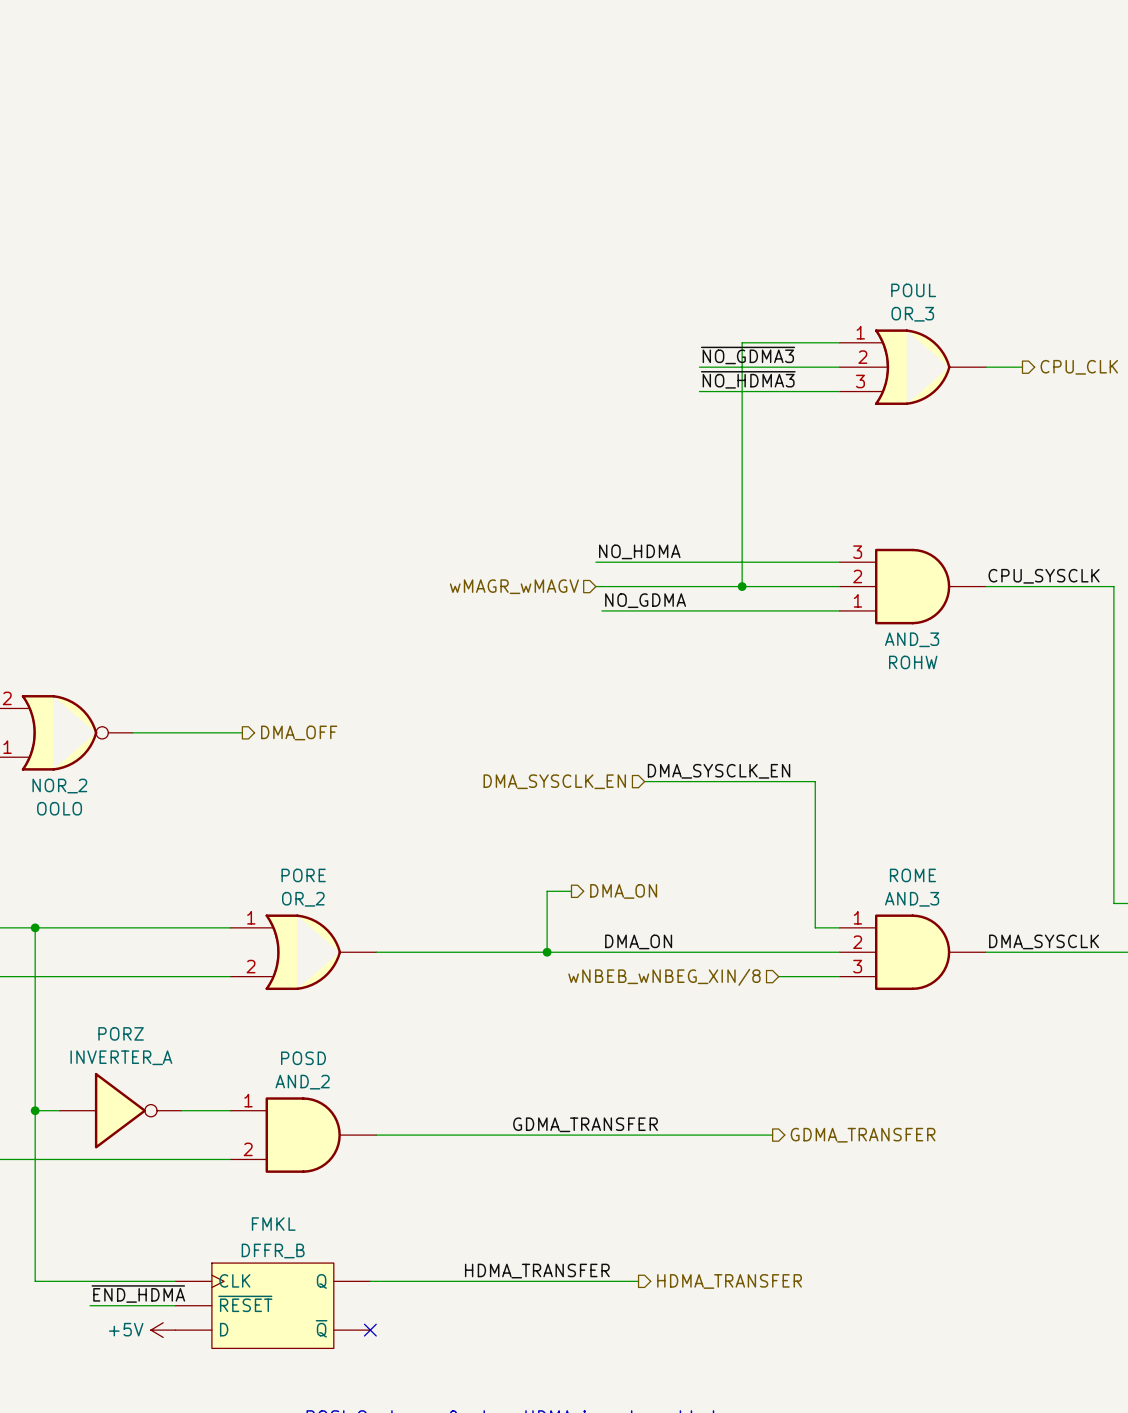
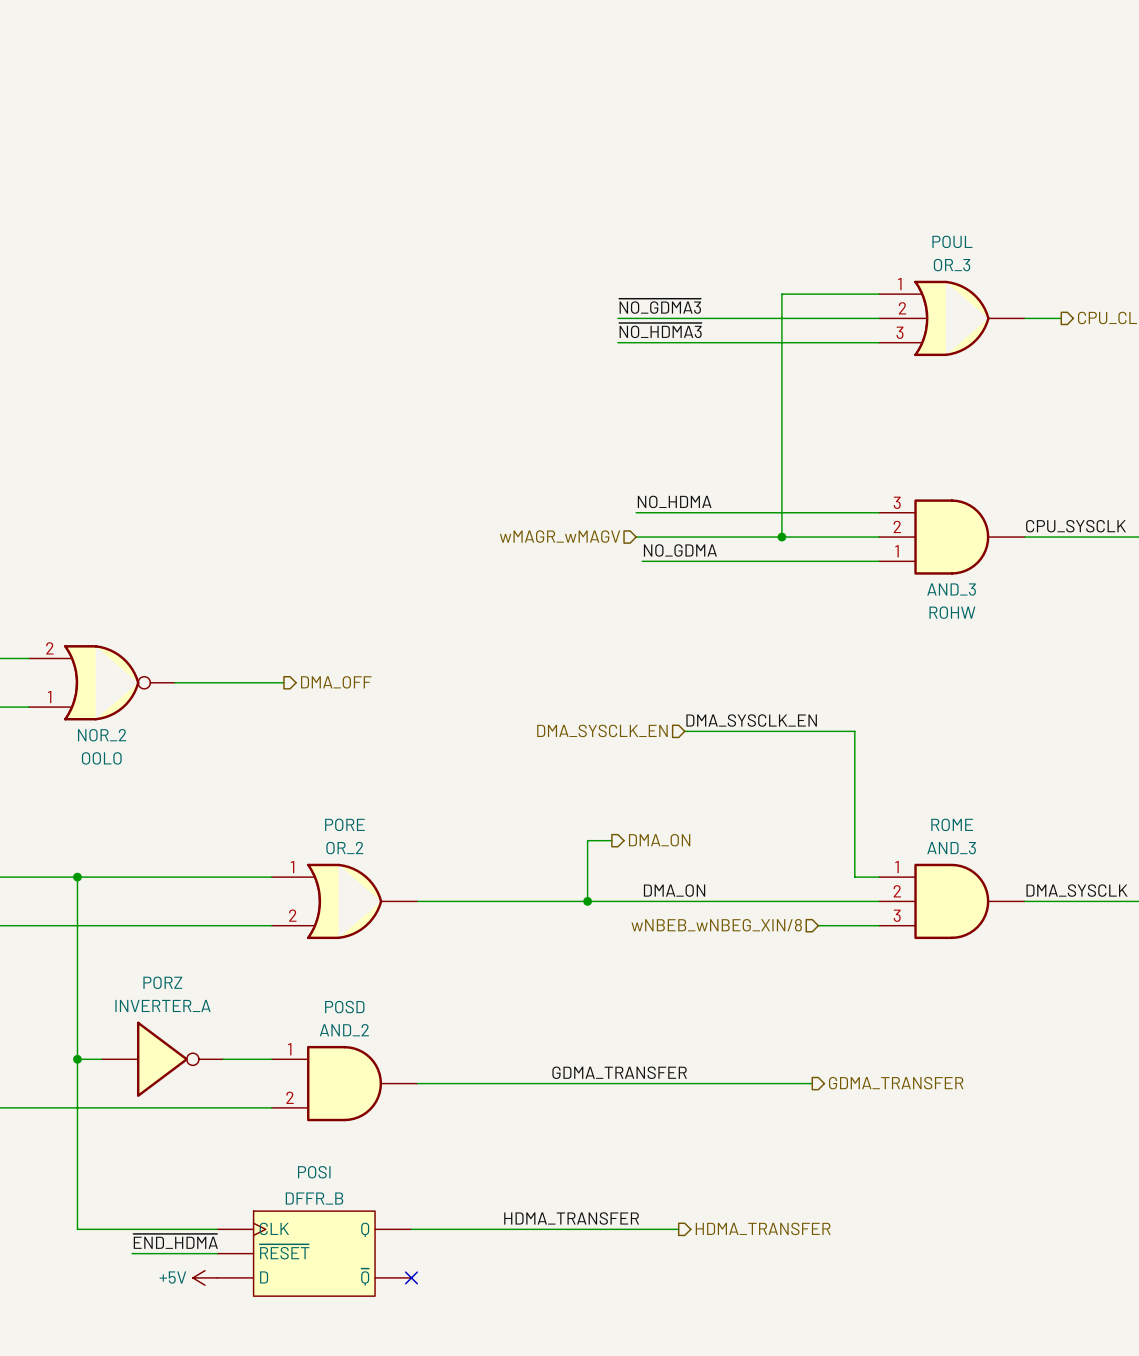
label position: ~{NO_GDMA3} (748, 355) -> ~{NO_GDMA3} (660, 306)
wire: none -> (617, 318) (739, 318)
label position: ~{NO_HDMA3} (748, 379) -> ~{NO_HDMA3} (660, 330)
wire: none -> (617, 342) (739, 342)
FMKL name: FMKL (273, 1224) -> POSI (314, 1172)

